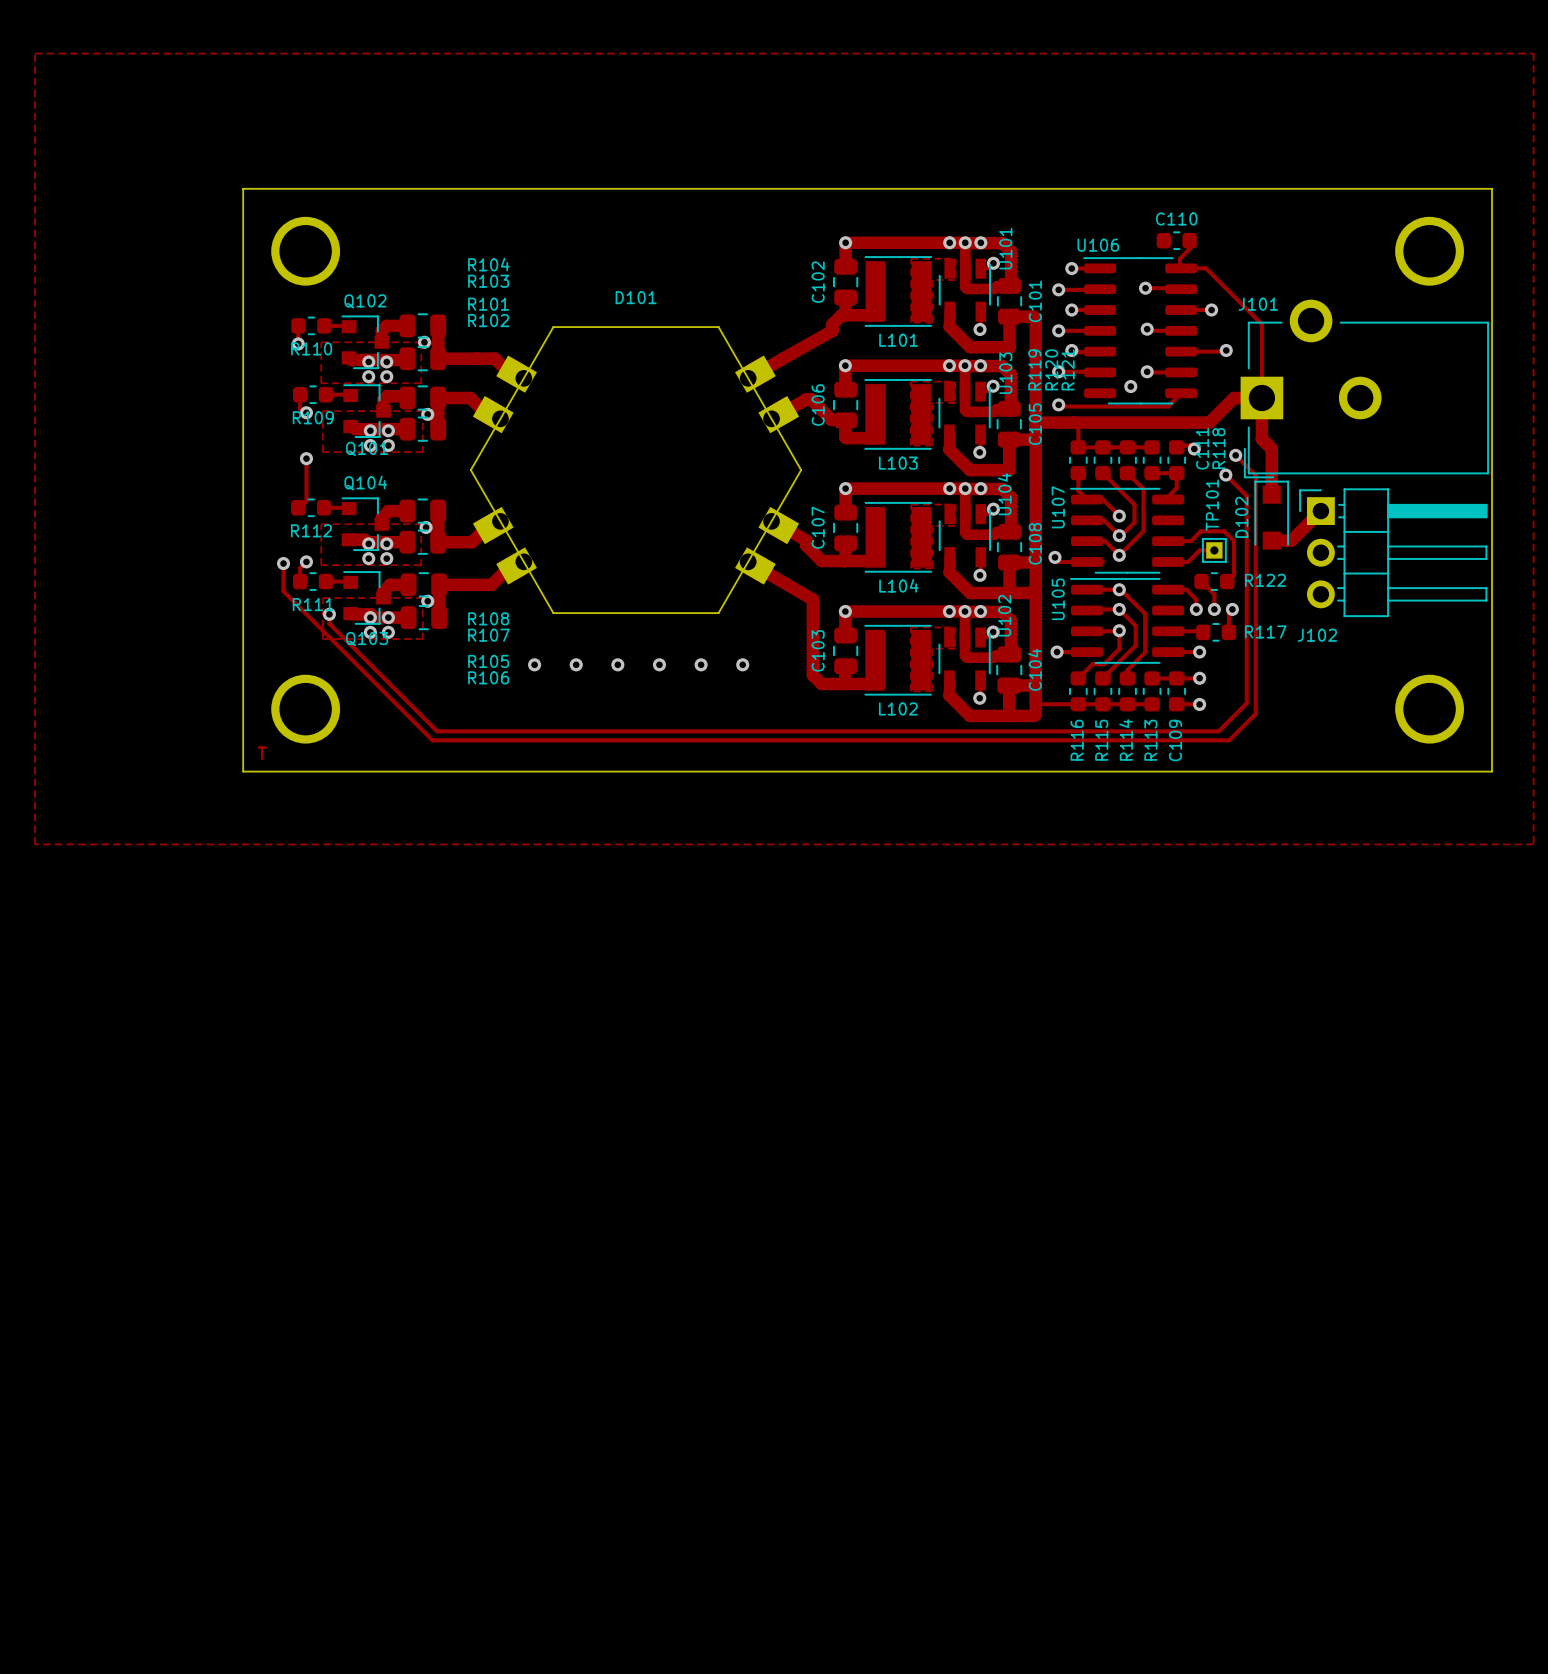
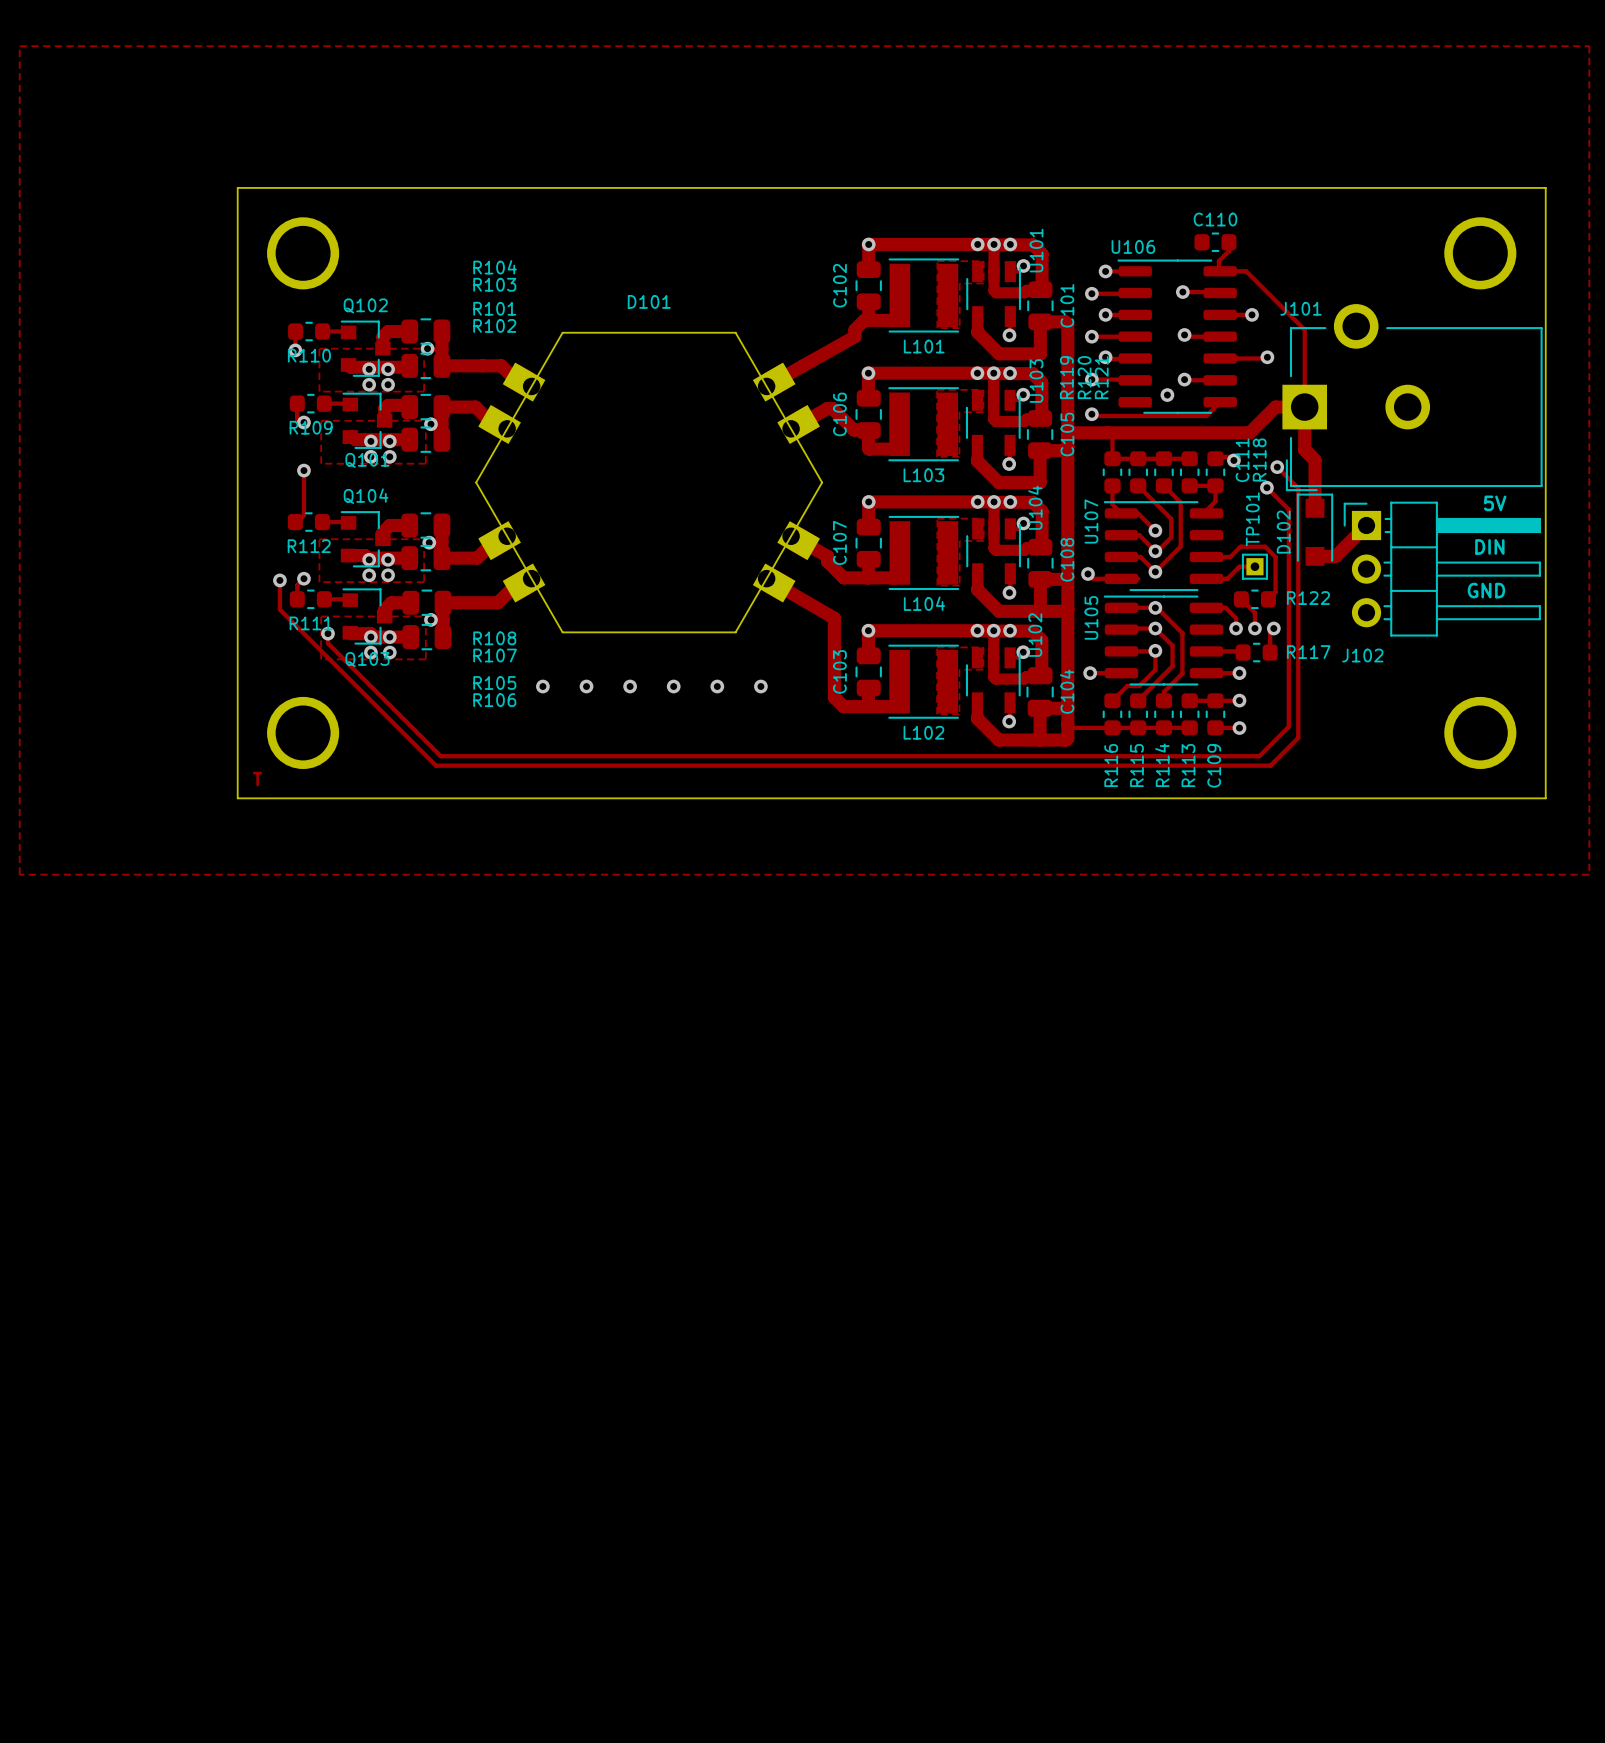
text: none -> 5V (1495, 503)
text: none -> DIN (1489, 546)
text: none -> GND (1486, 590)

